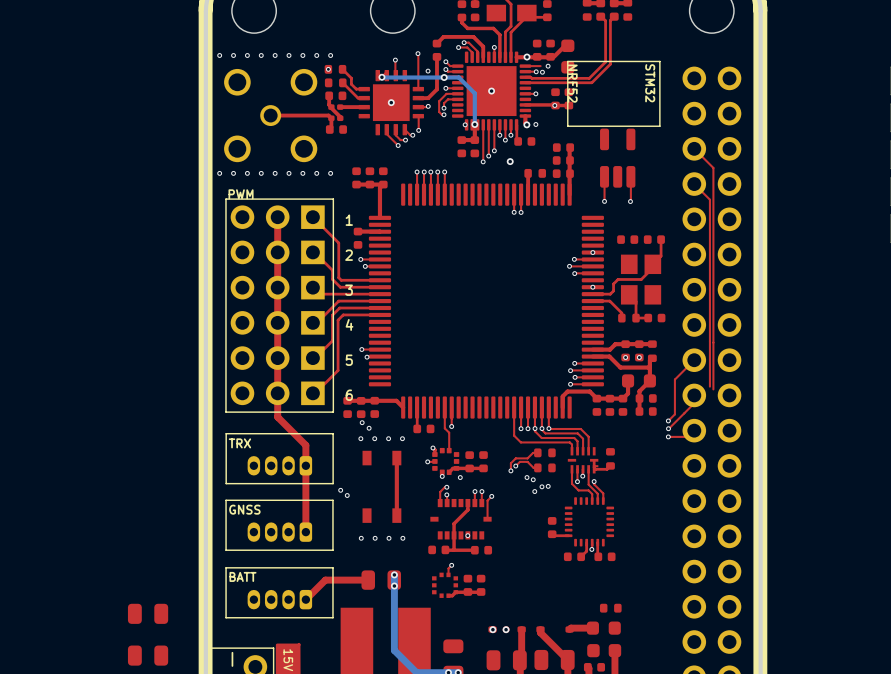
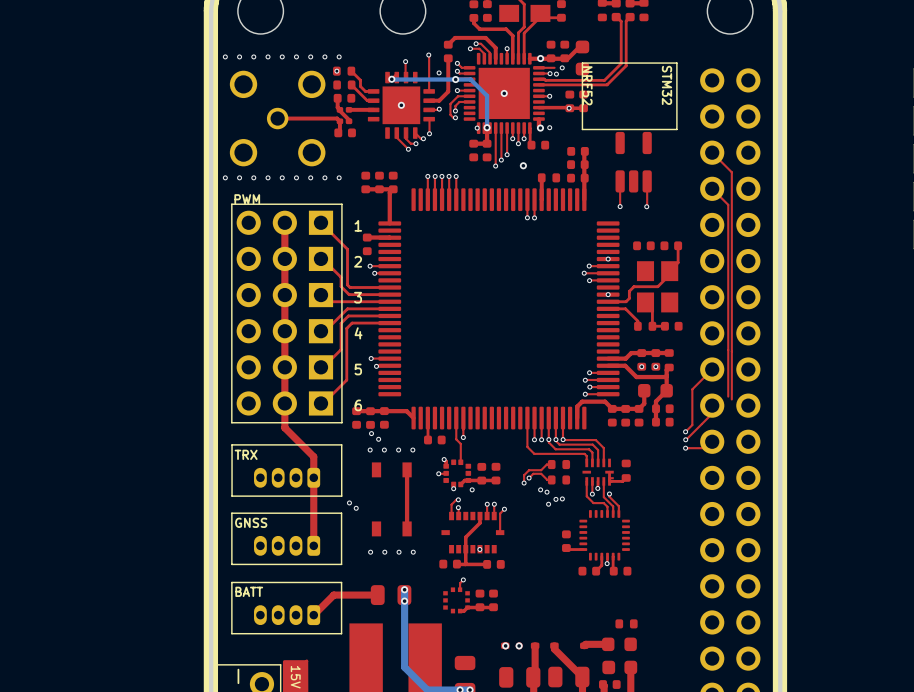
part: (148, 613) -> none
part: (148, 655) -> none

